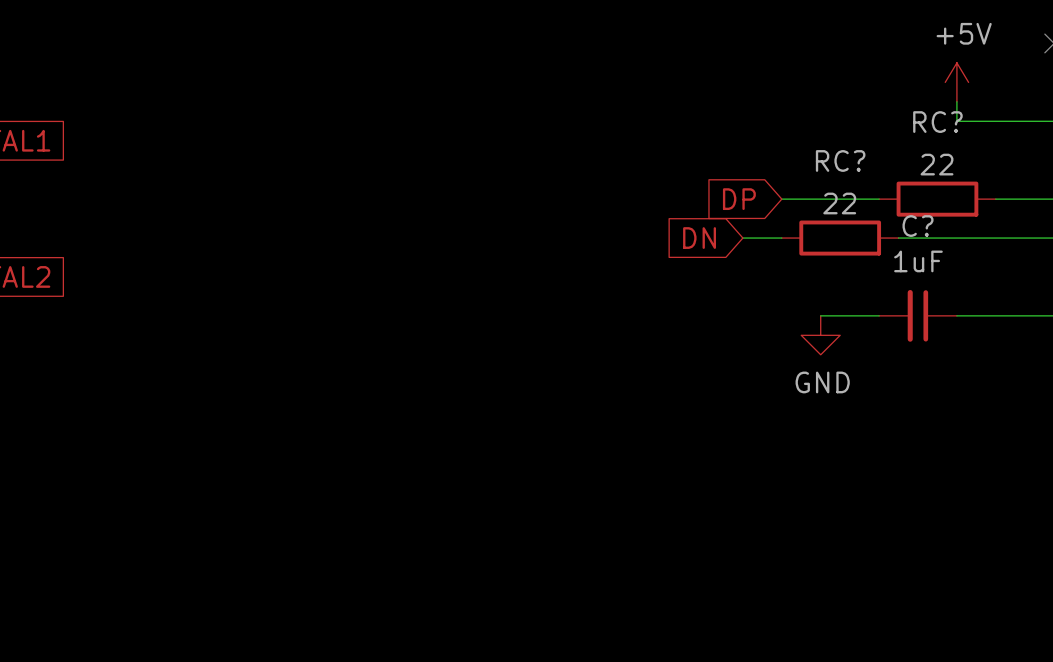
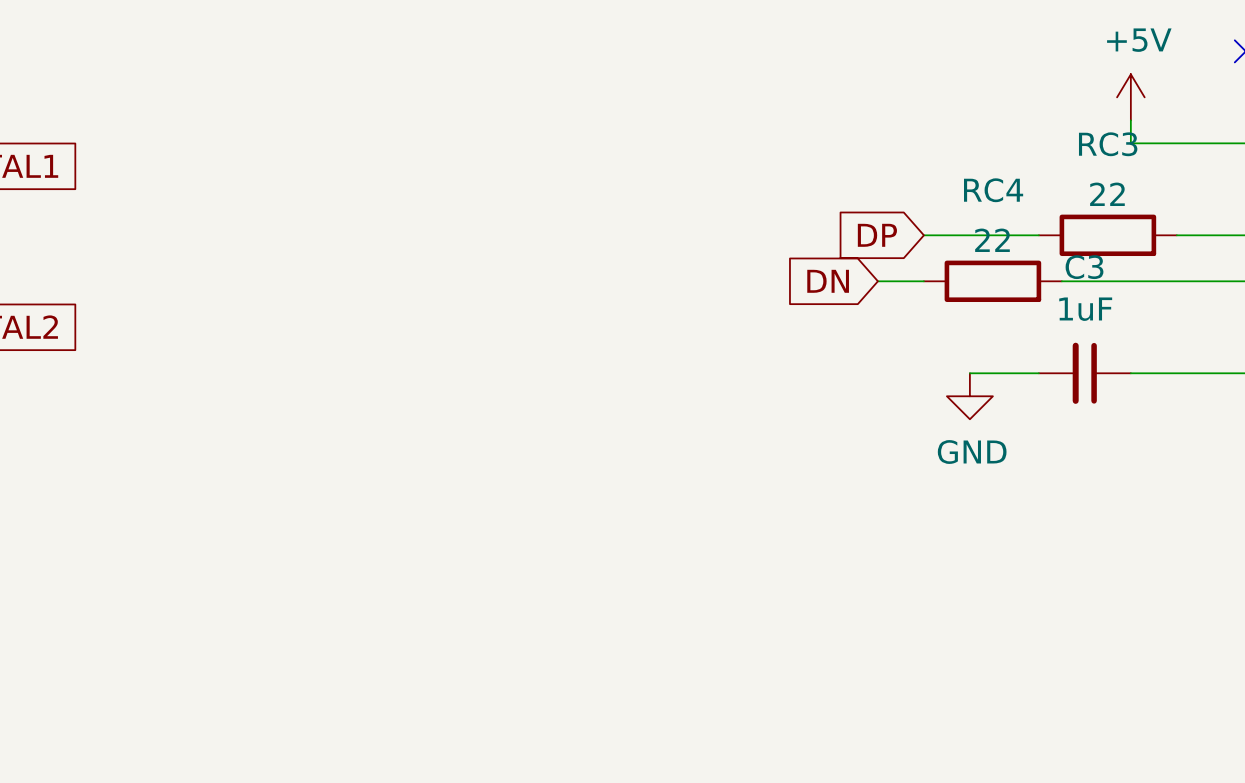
RC? name: RC? (937, 122) -> RC3 (1108, 144)
RC? name: RC? (840, 160) -> RC4 (993, 190)
C? name: C? (918, 226) -> C3 (1084, 267)

